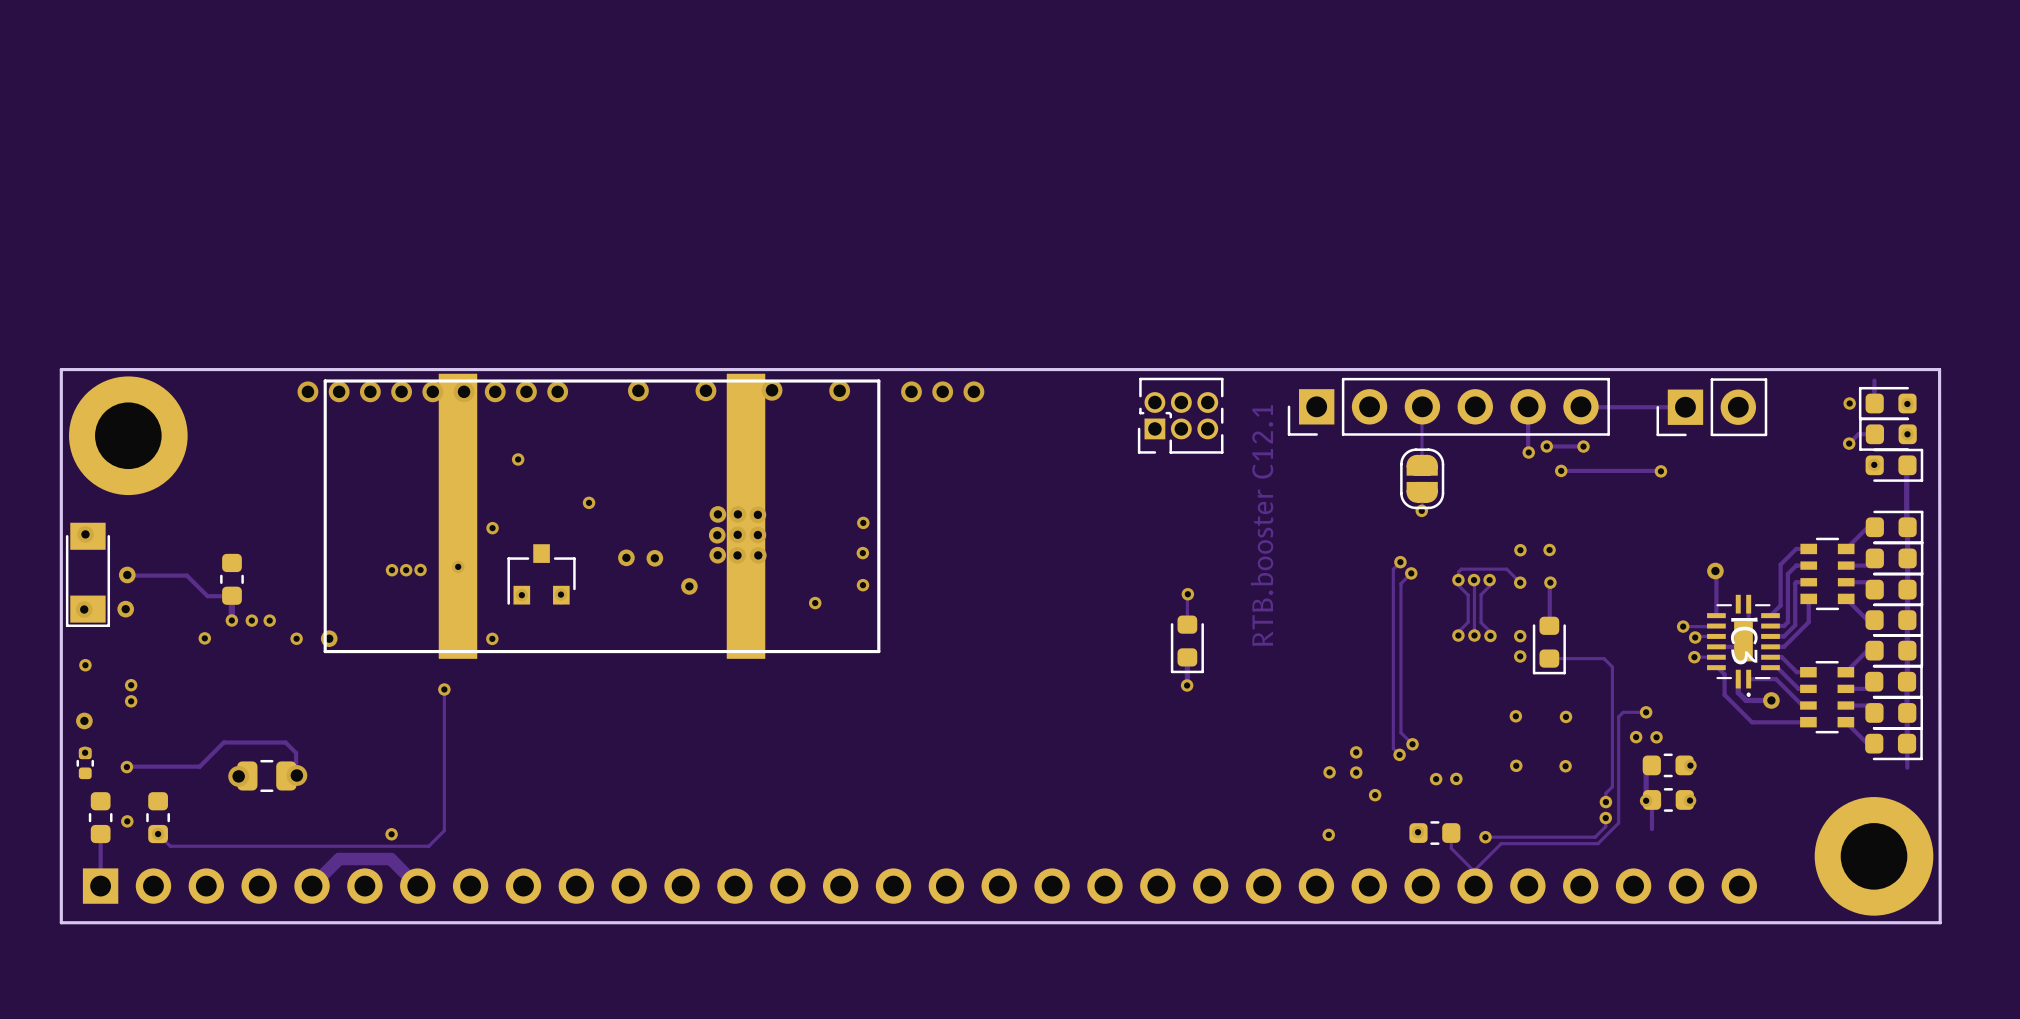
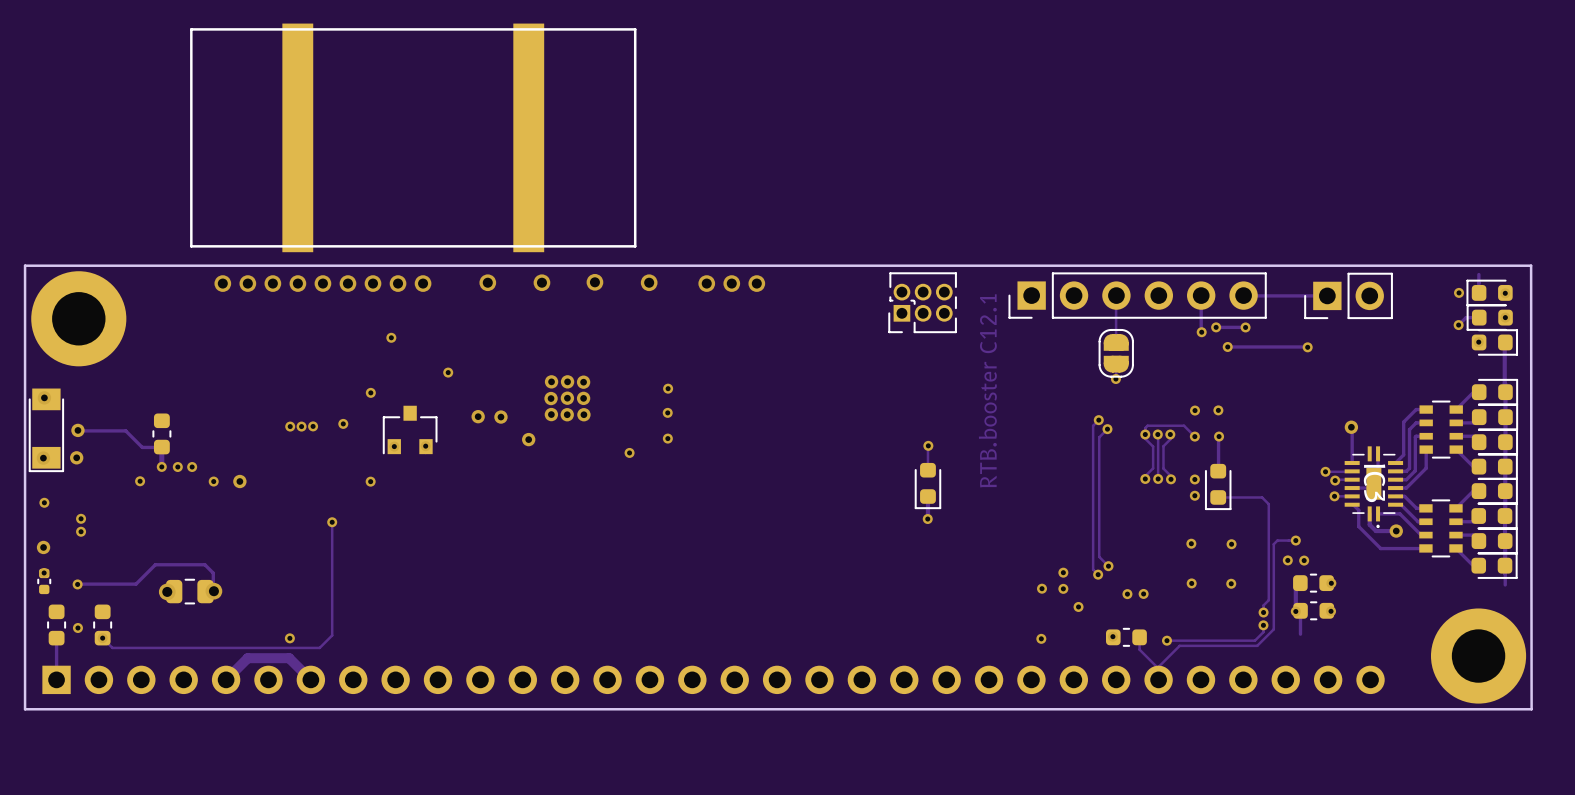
part position: (602, 516) -> (413, 137)

